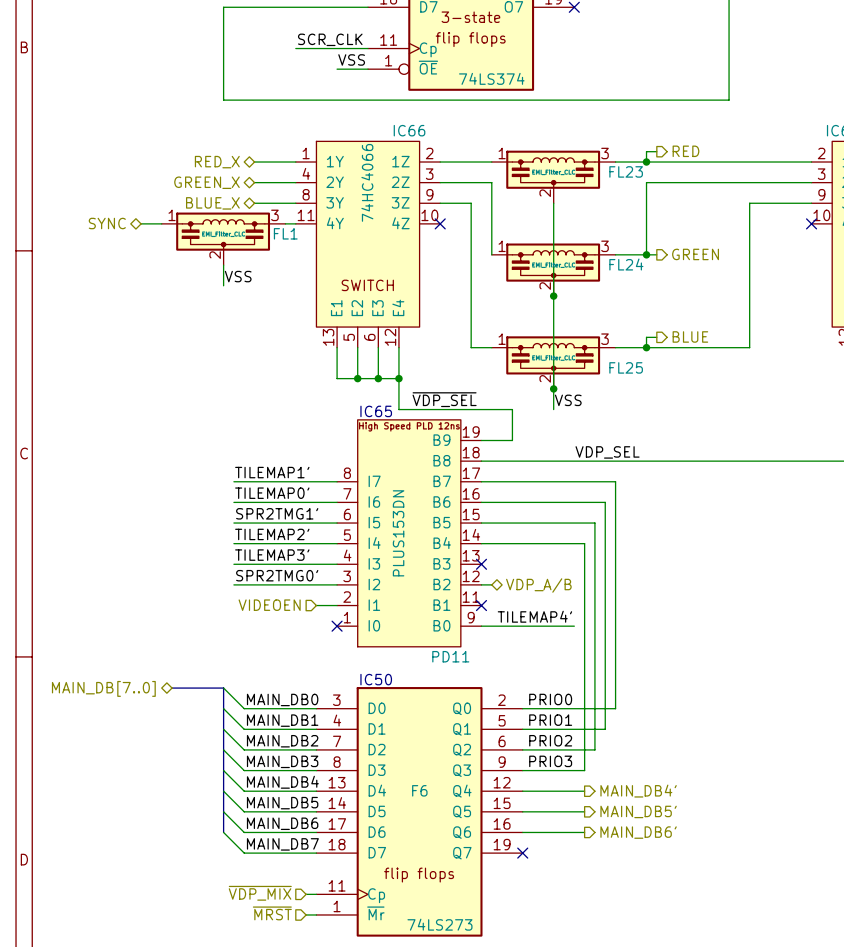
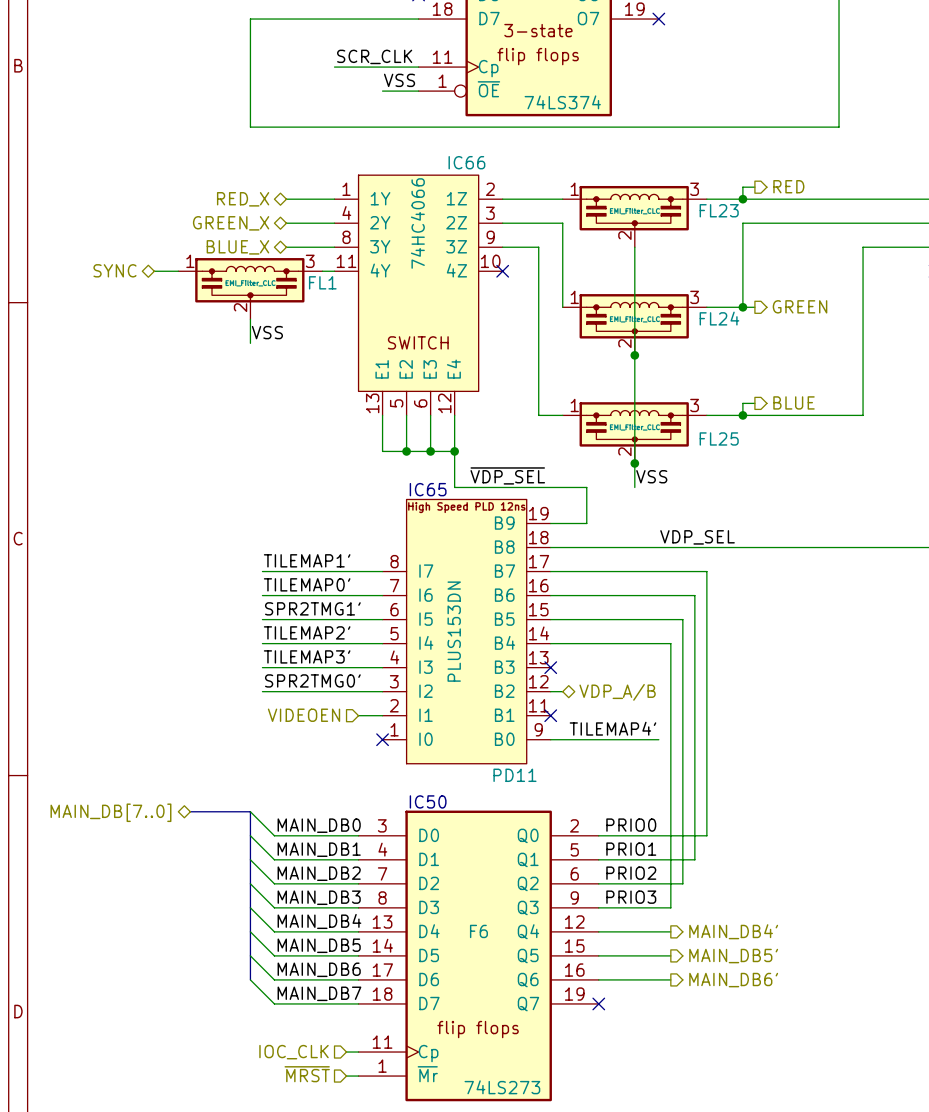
hierarchical label: ~{VDP_MIX} (260, 893) -> IOC_CLK (294, 1052)

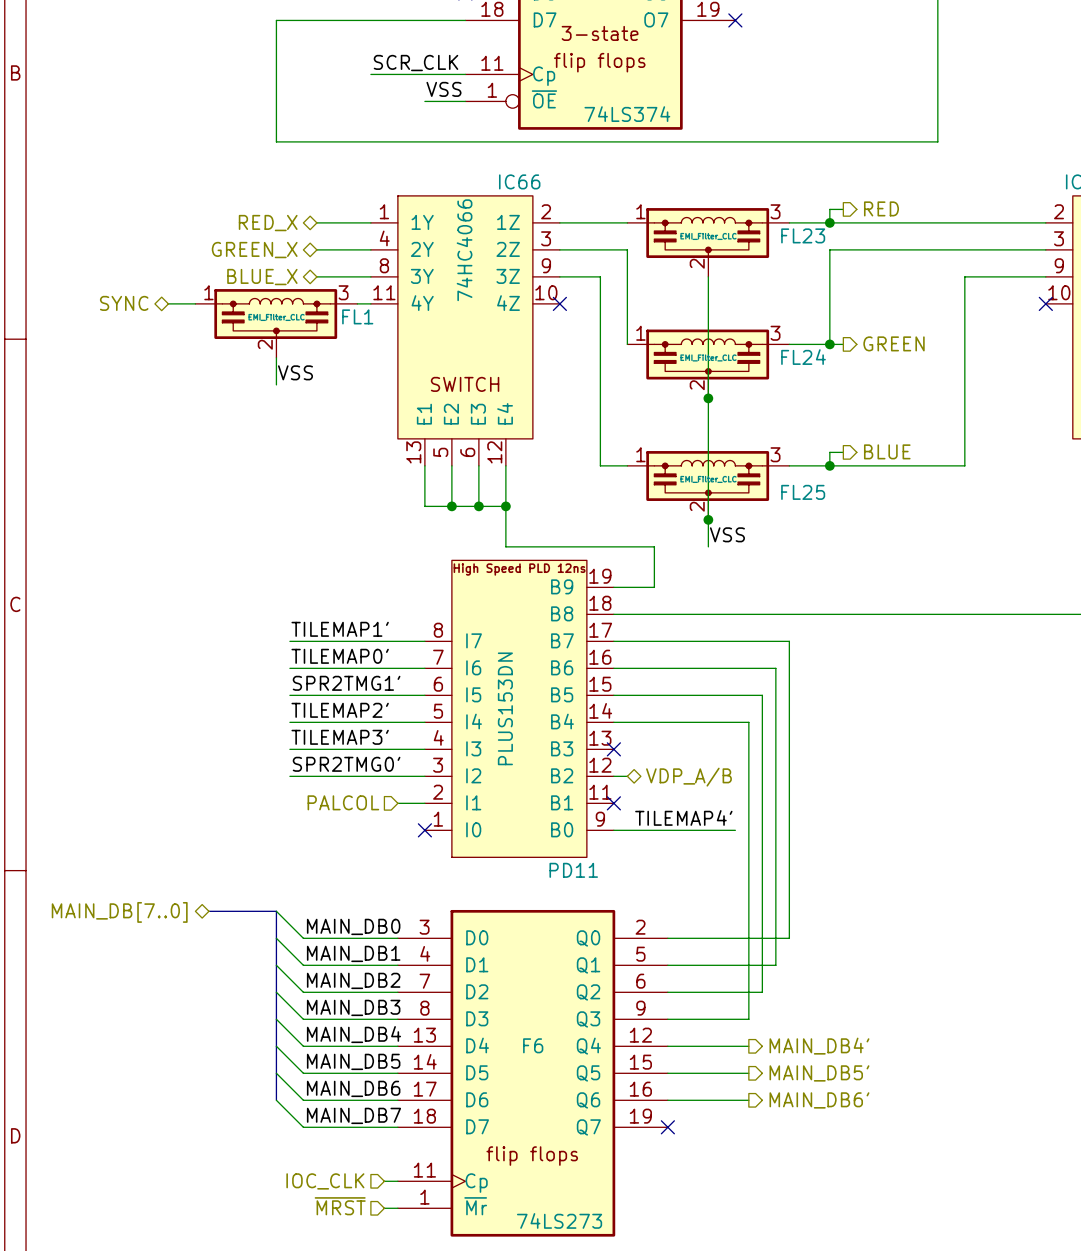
label: ~{VDP_SEL} (507, 475) -> none
text: IC65 (428, 489) -> none
label: VDP_SEL (697, 537) -> none
hierarchical label: VIDEOEN (304, 715) -> PALCOL (343, 802)
text: IC50 (428, 801) -> none
label: PRIO0 (631, 825) -> none
label: PRIO1 (631, 849) -> none
label: PRIO2 (631, 873) -> none
label: PRIO3 (631, 897) -> none

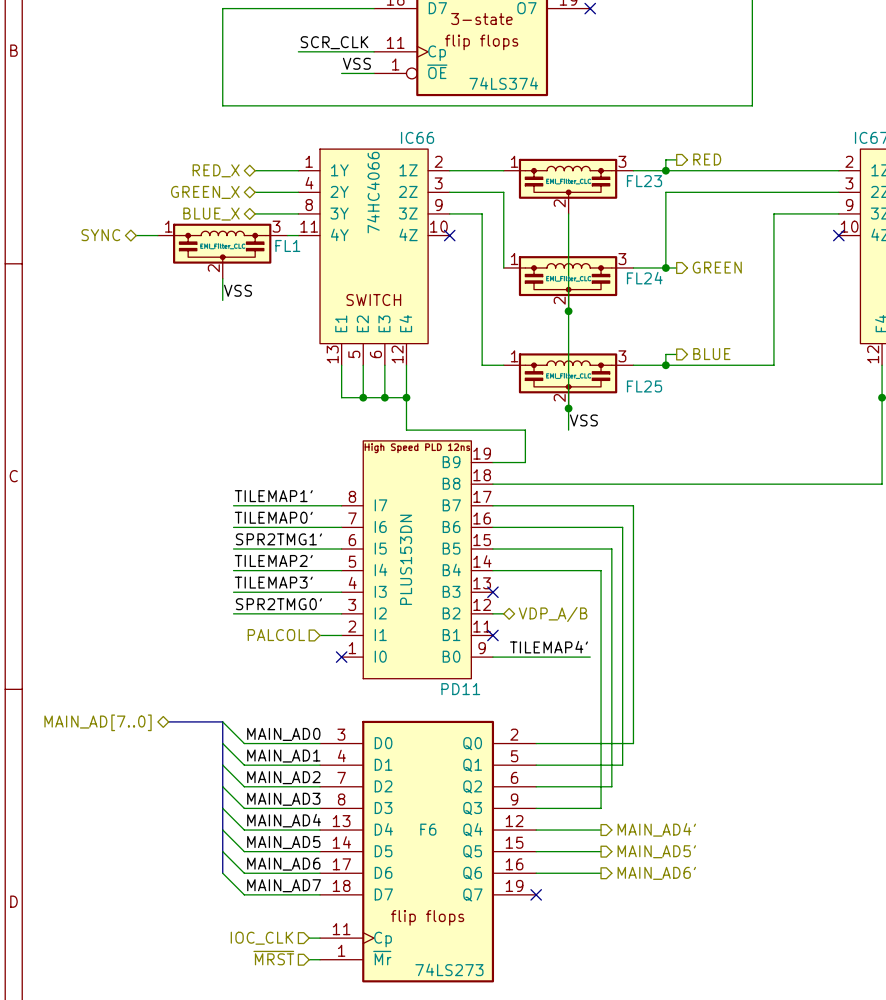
hierarchical label: MAIN_DB[7..0] (119, 912) -> MAIN_AD[7..0] (98, 722)
label: MAIN_DB0 (353, 926) -> MAIN_AD0 (283, 734)
label: MAIN_DB1 (353, 953) -> MAIN_AD1 (283, 756)
label: MAIN_DB2 (353, 980) -> MAIN_AD2 (283, 777)
label: MAIN_DB3 (353, 1007) -> MAIN_AD3 (283, 799)
label: MAIN_DB4 (353, 1034) -> MAIN_AD4 (284, 820)
hierarchical label: MAIN_DB4' (819, 1046) -> MAIN_AD4' (656, 829)
label: MAIN_DB5 (353, 1061) -> MAIN_AD5 (283, 842)
hierarchical label: MAIN_DB5' (819, 1073) -> MAIN_AD5' (656, 851)
label: MAIN_DB6 (353, 1088) -> MAIN_AD6 (283, 864)
hierarchical label: MAIN_DB6' (819, 1100) -> MAIN_AD6' (656, 873)
label: MAIN_DB7 (353, 1115) -> MAIN_AD7 (284, 885)

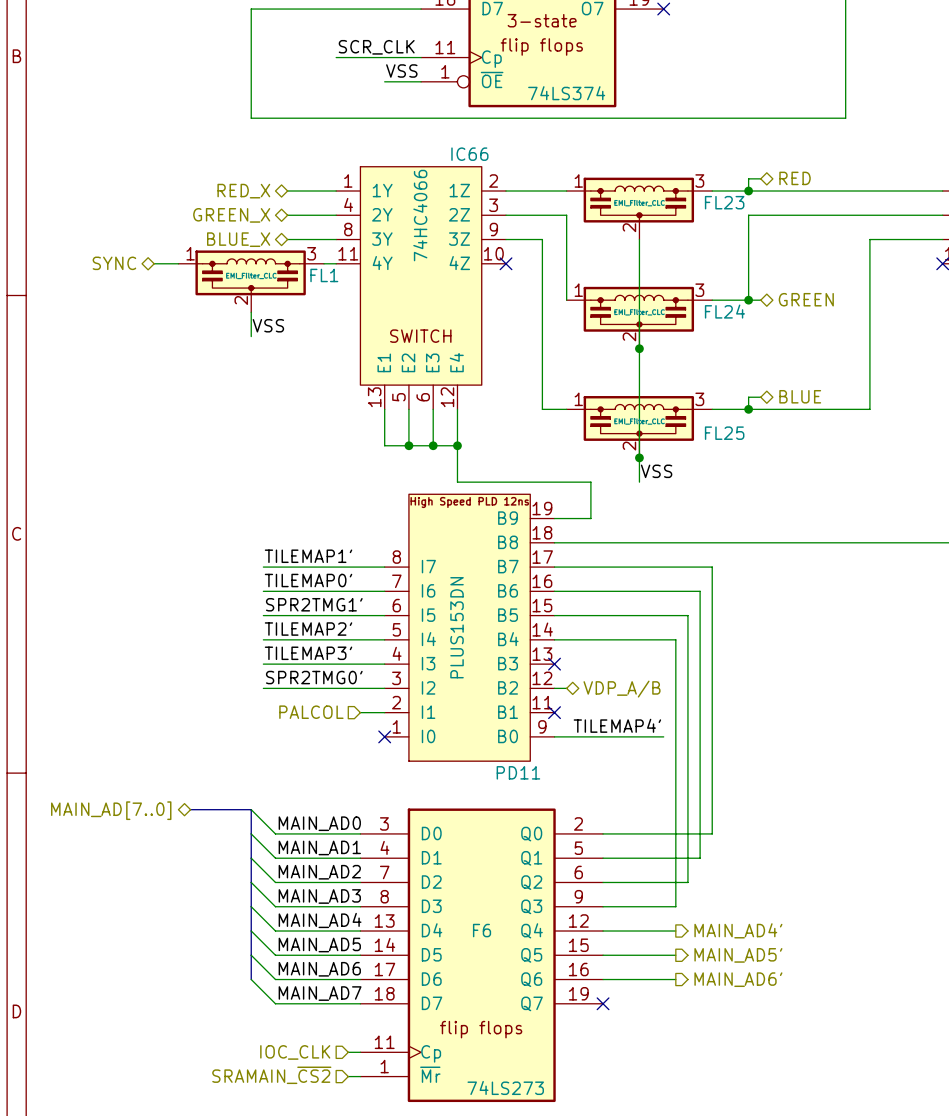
hierarchical label shape: output (707, 159) -> bidirectional (795, 178)
hierarchical label shape: output (717, 267) -> bidirectional (806, 299)
hierarchical label shape: output (711, 354) -> bidirectional (800, 396)
hierarchical label: ~{MRST} (273, 958) -> SRAMAIN_~{CS2} (271, 1075)

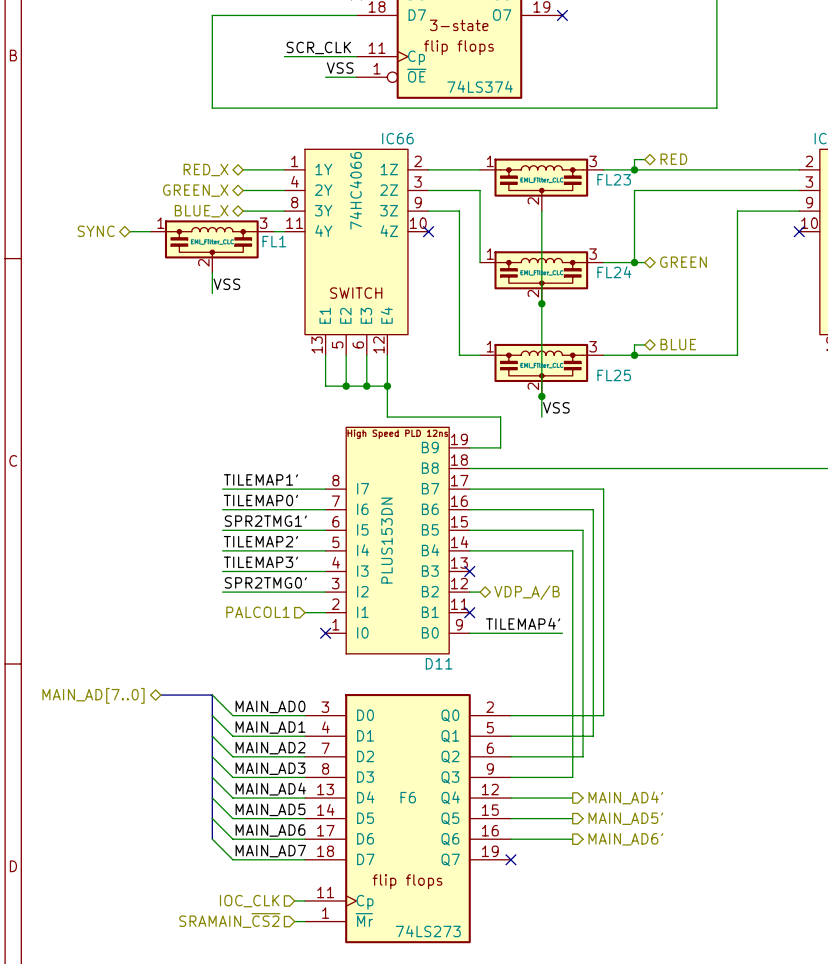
hierarchical label: PALCOL (311, 712) -> PALCOL1 (258, 612)
PD11 name: PD11 (518, 772) -> D11 (439, 663)

